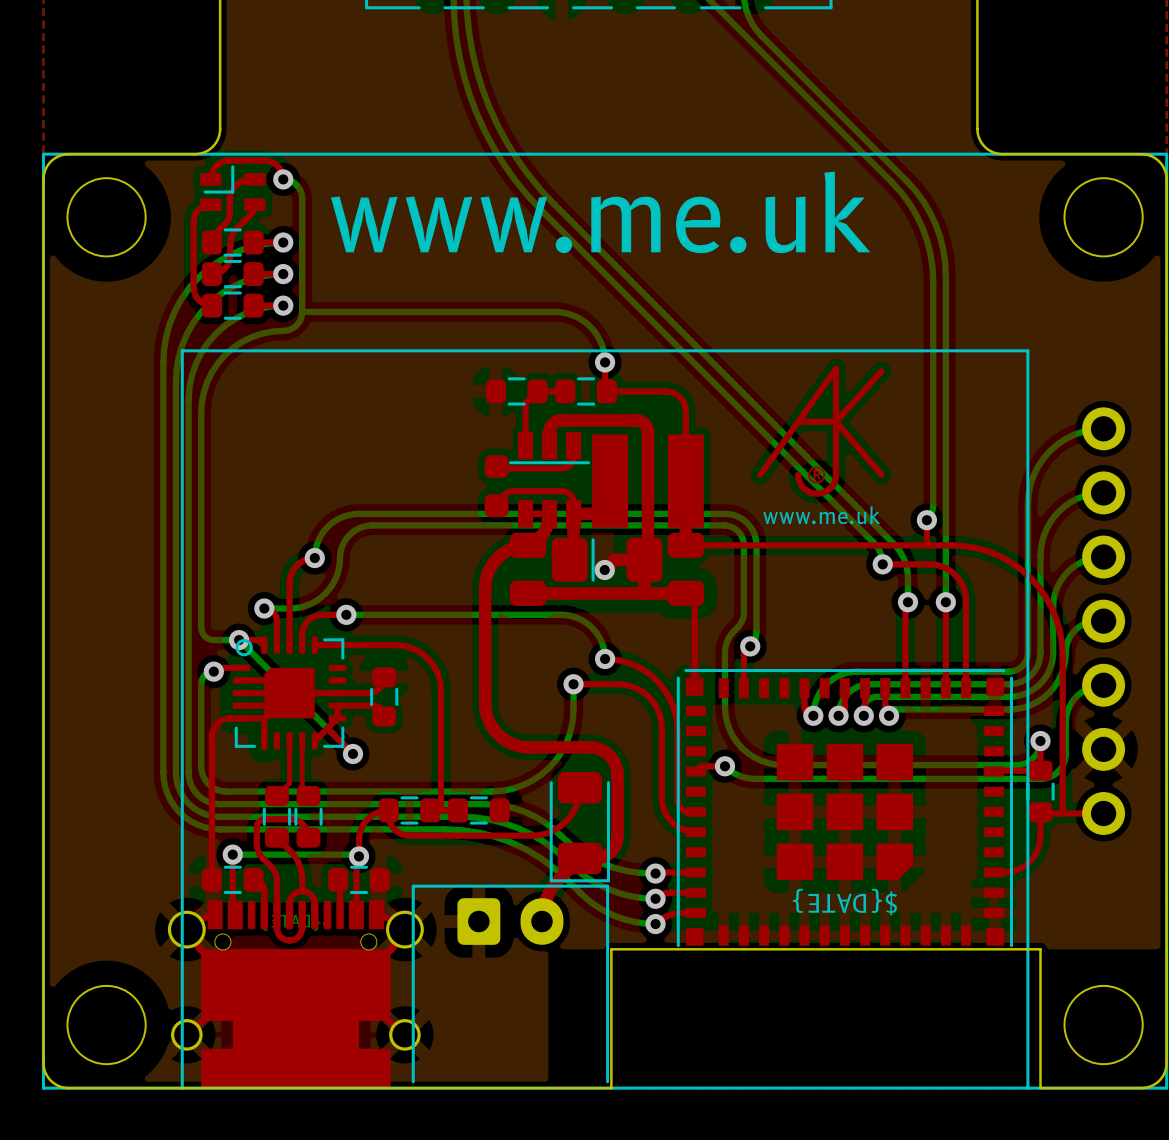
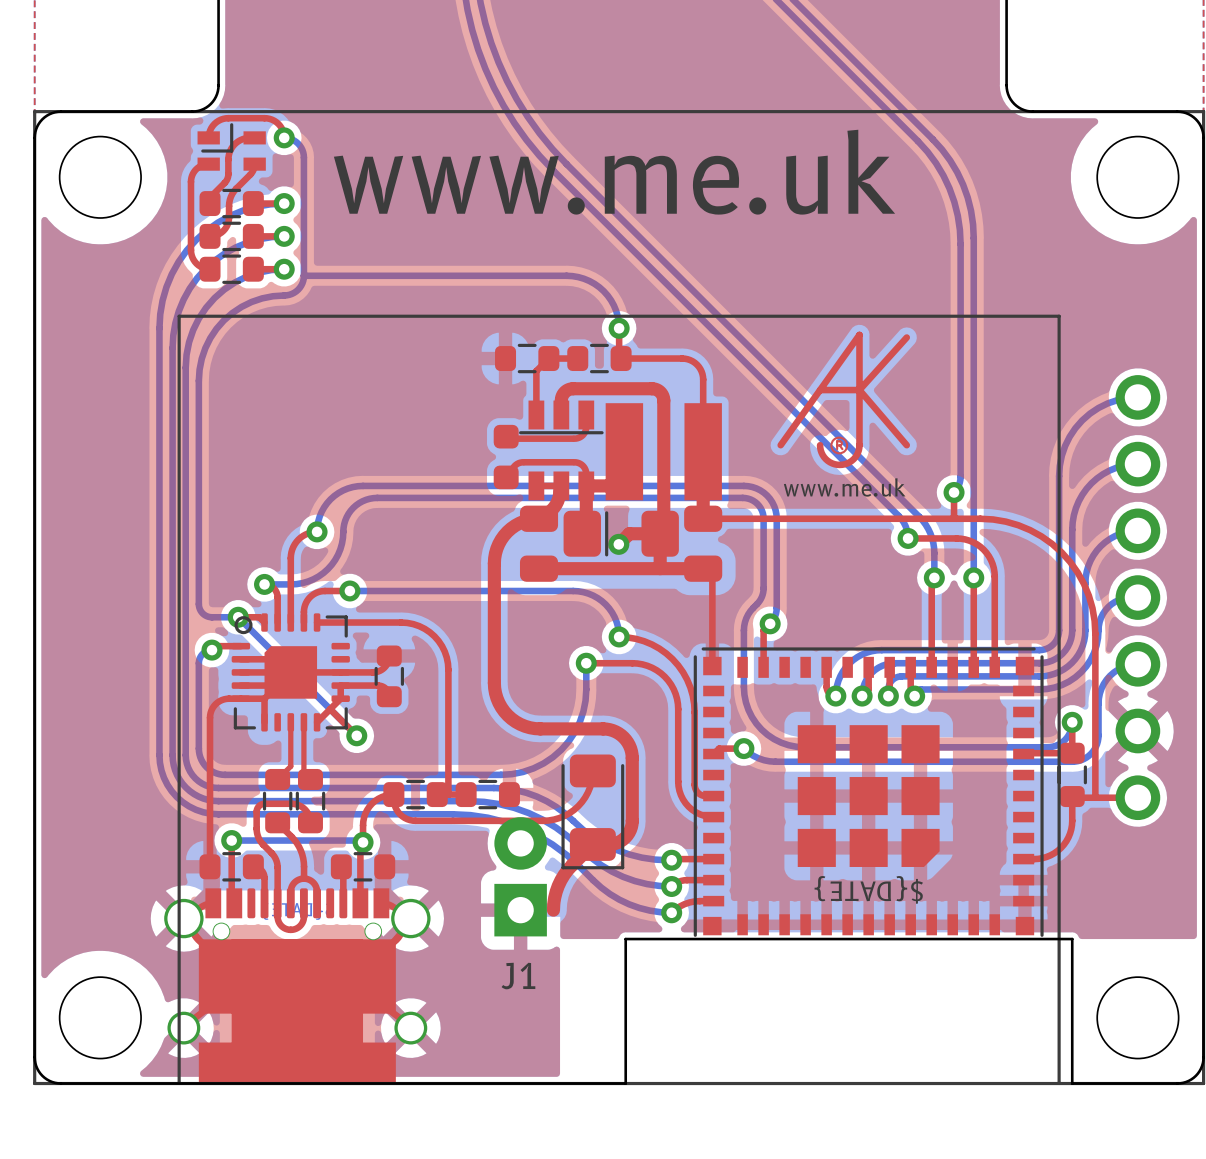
J1: none -> (520, 876)
part: (510, 984) -> none

